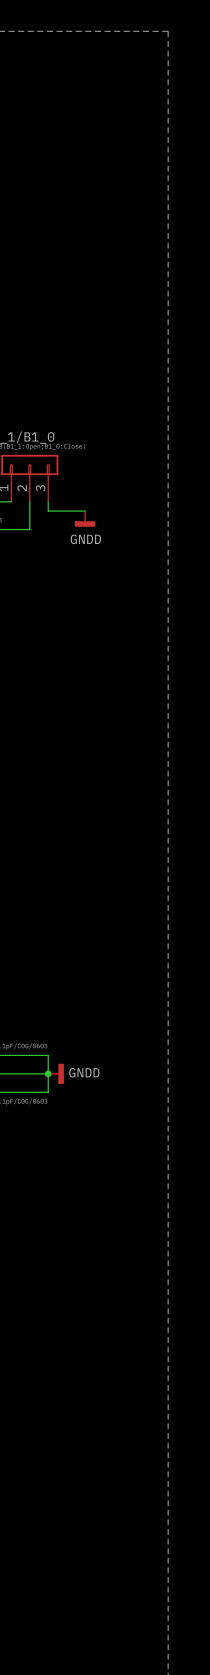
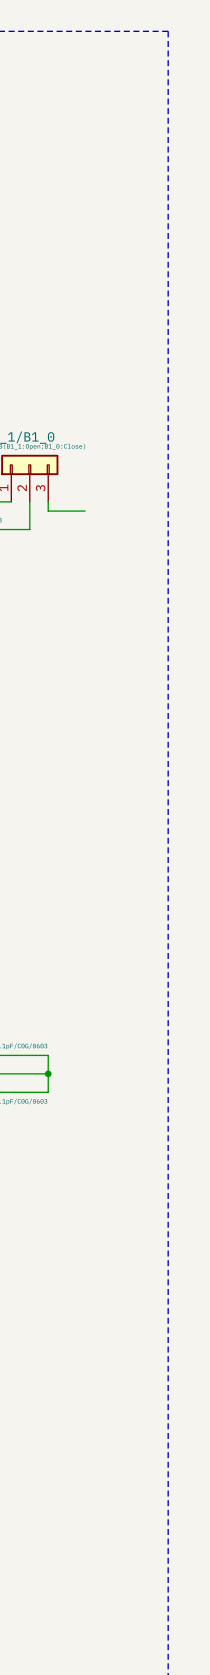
power symbol: GNDD (85, 518) -> none
power symbol: GNDD (56, 1073) -> none

